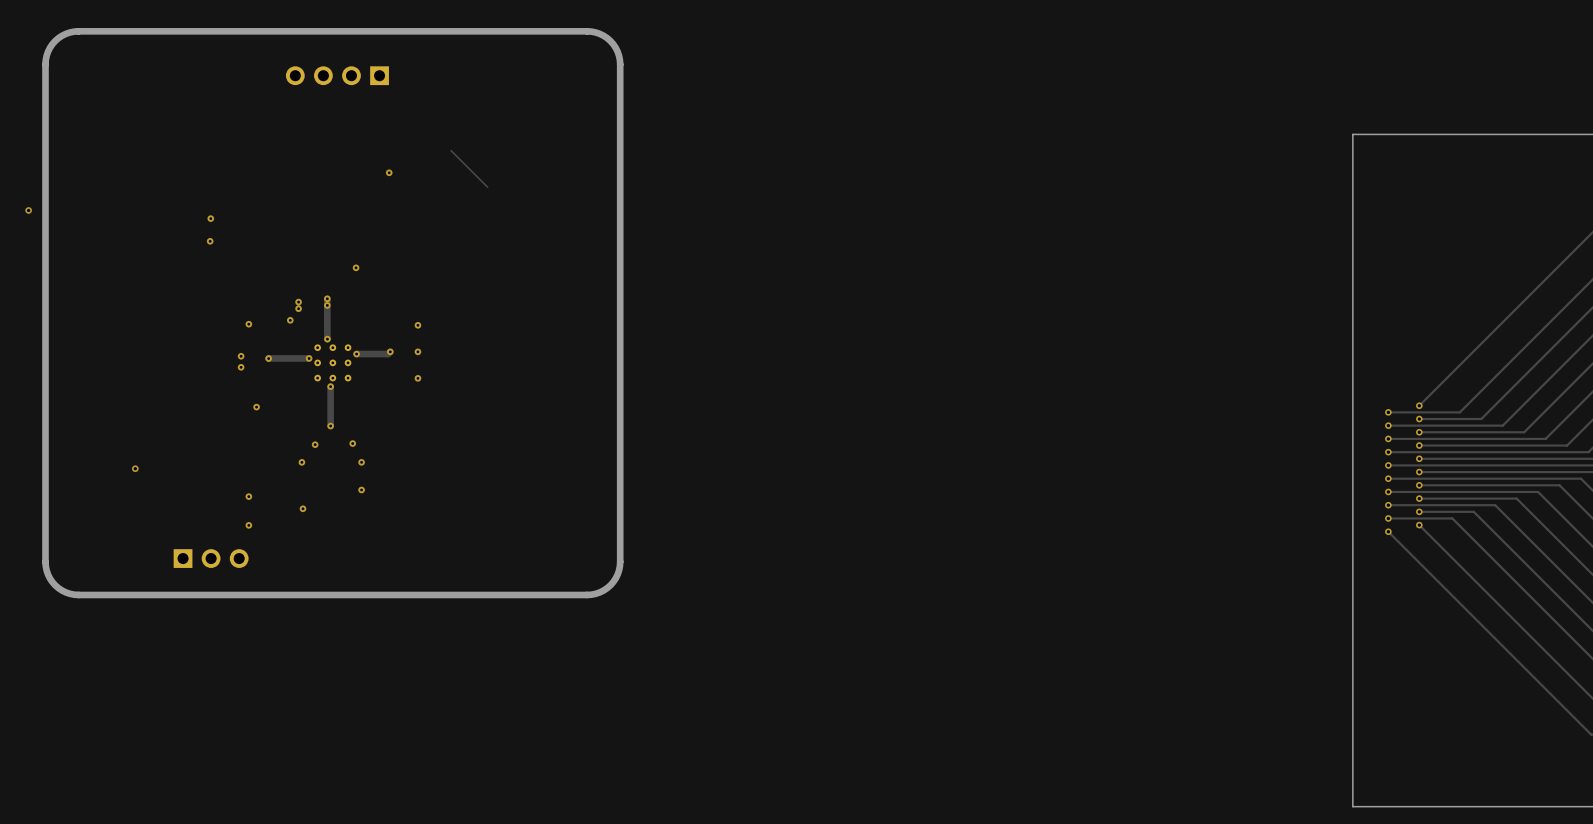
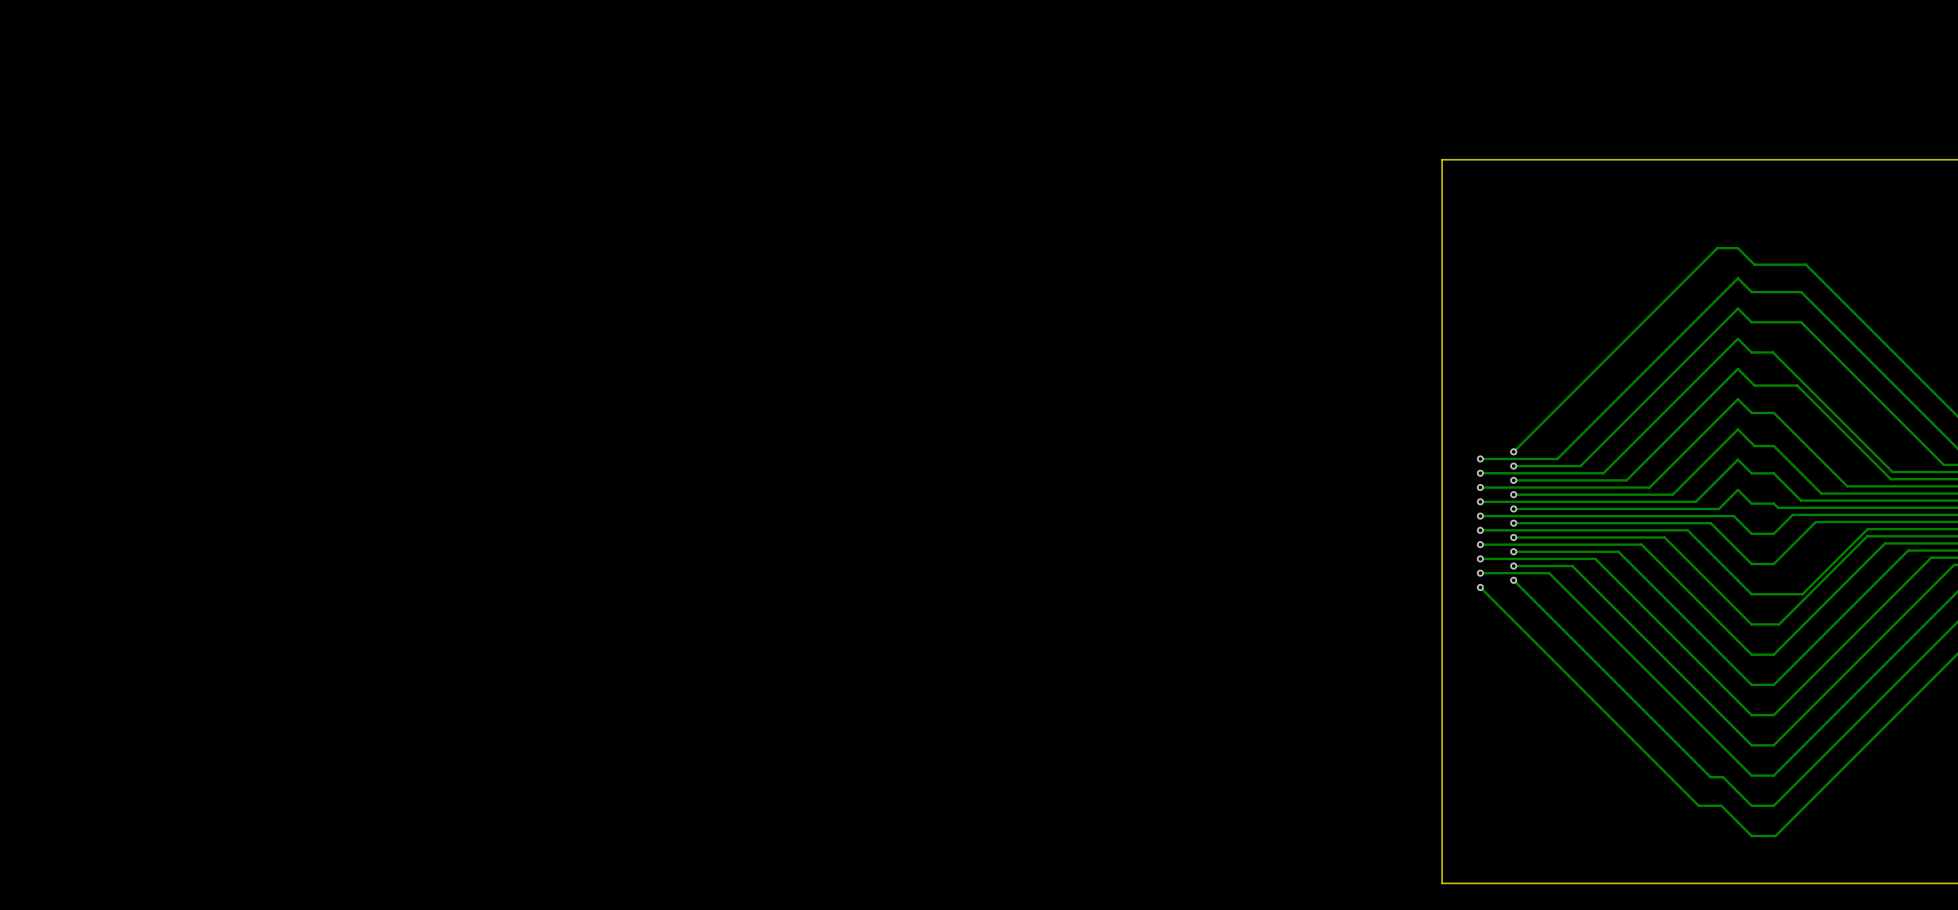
board edge: (587, 31) (78, 31) (65, 33) (55, 41) (48, 51) (45, 64) (45, 561) (48, 574) (55, 585) (65, 592) (78, 594) (587, 594) (599, 592) (610, 585) (617, 574) (620, 561) (620, 64) (617, 51) (610, 41) (599, 33) (587, 31) -> none
part: (337, 75) -> none
track: (451, 150) (487, 187) -> none
via: (389, 172) -> none
via: (28, 210) -> none
via: (210, 218) -> none
via: (210, 241) -> none
via: (356, 267) -> none
track: (327, 298) (327, 338) -> none
via: (327, 298) -> none
via: (298, 302) -> none
via: (327, 305) -> none
via: (298, 308) -> none
via: (290, 320) -> none
via: (248, 324) -> none
via: (417, 325) -> none
via: (327, 339) -> none
track: (390, 351) (388, 354) (356, 354) -> none
via: (390, 351) -> none
via: (417, 351) -> none
via: (356, 354) -> none
via: (241, 356) -> none
via: (268, 358) -> none
track: (309, 358) (268, 358) -> none
via: (309, 358) -> none
part: (332, 362) -> none
via: (241, 367) -> none
via: (417, 378) -> none
track: (330, 386) (330, 426) -> none
via: (330, 386) -> none
via: (256, 407) -> none
via: (330, 426) -> none
via: (352, 443) -> none
via: (315, 444) -> none
via: (301, 462) -> none
via: (361, 462) -> none
via: (135, 468) -> none
via: (361, 489) -> none
via: (248, 496) -> none
via: (303, 508) -> none
via: (248, 525) -> none
part: (211, 558) -> none

